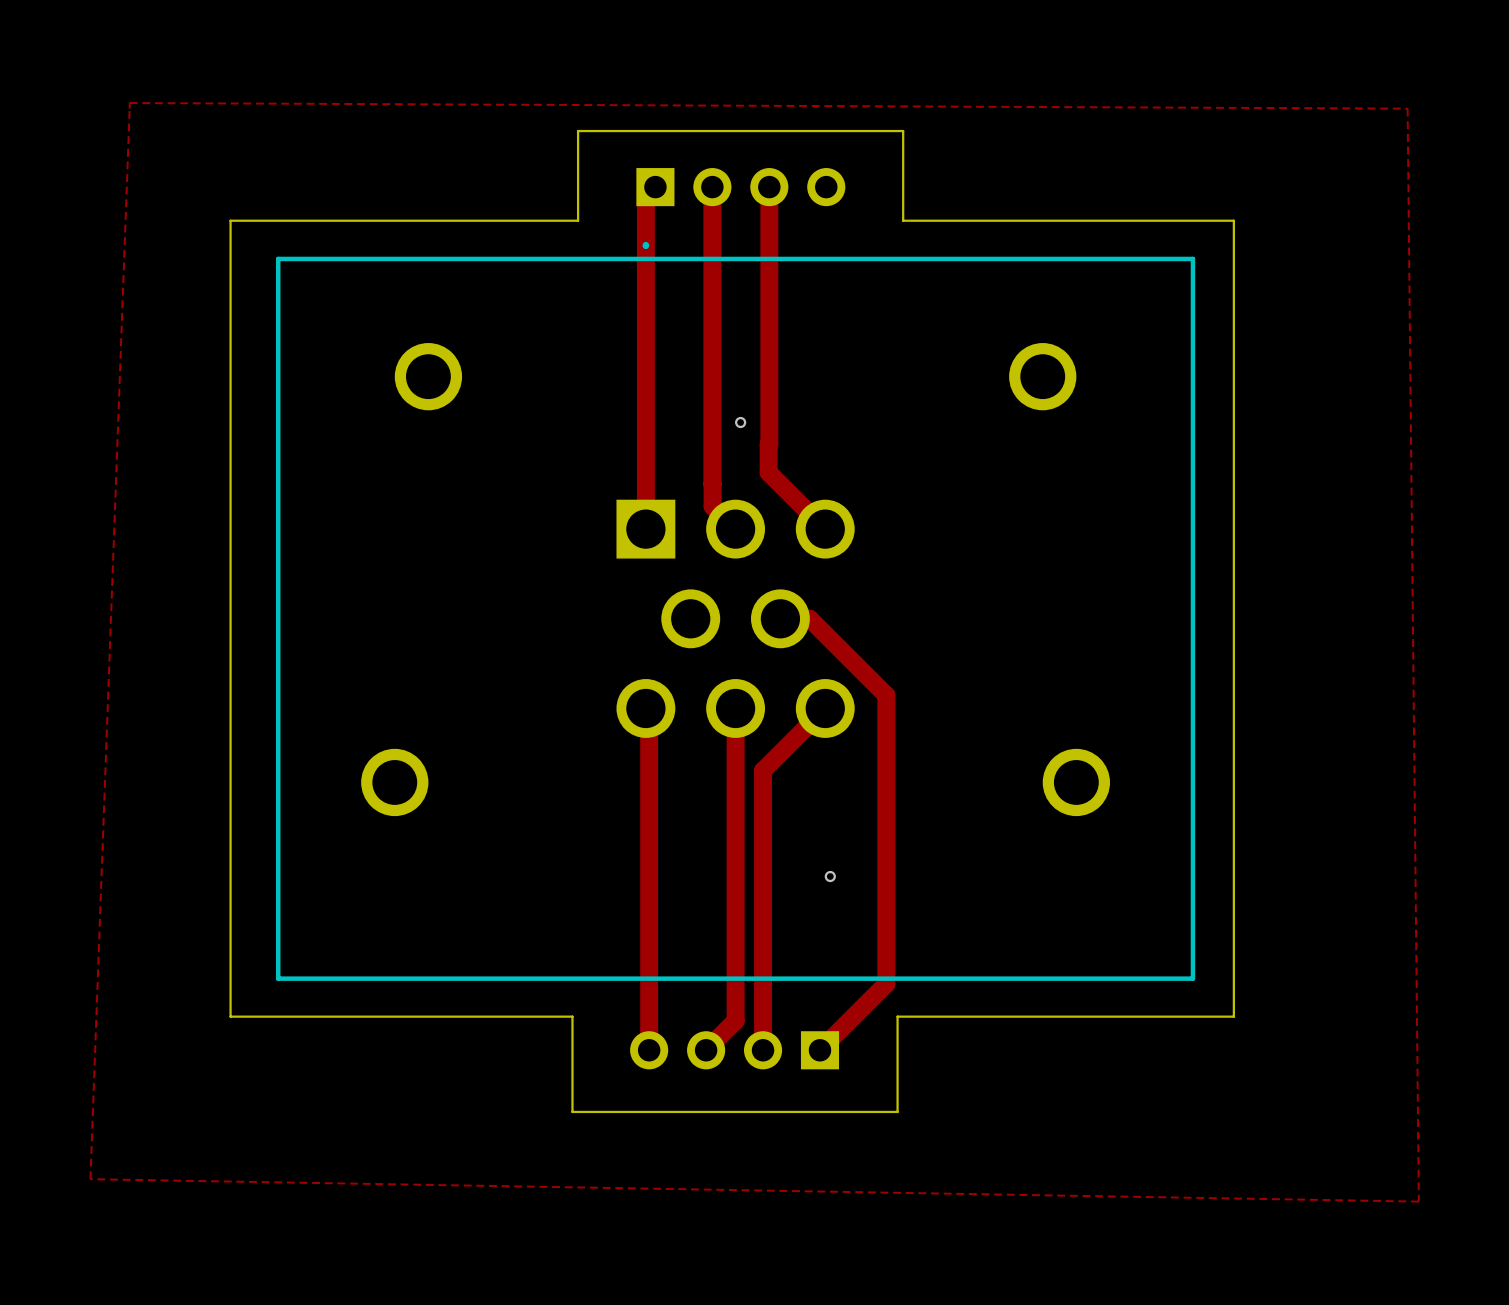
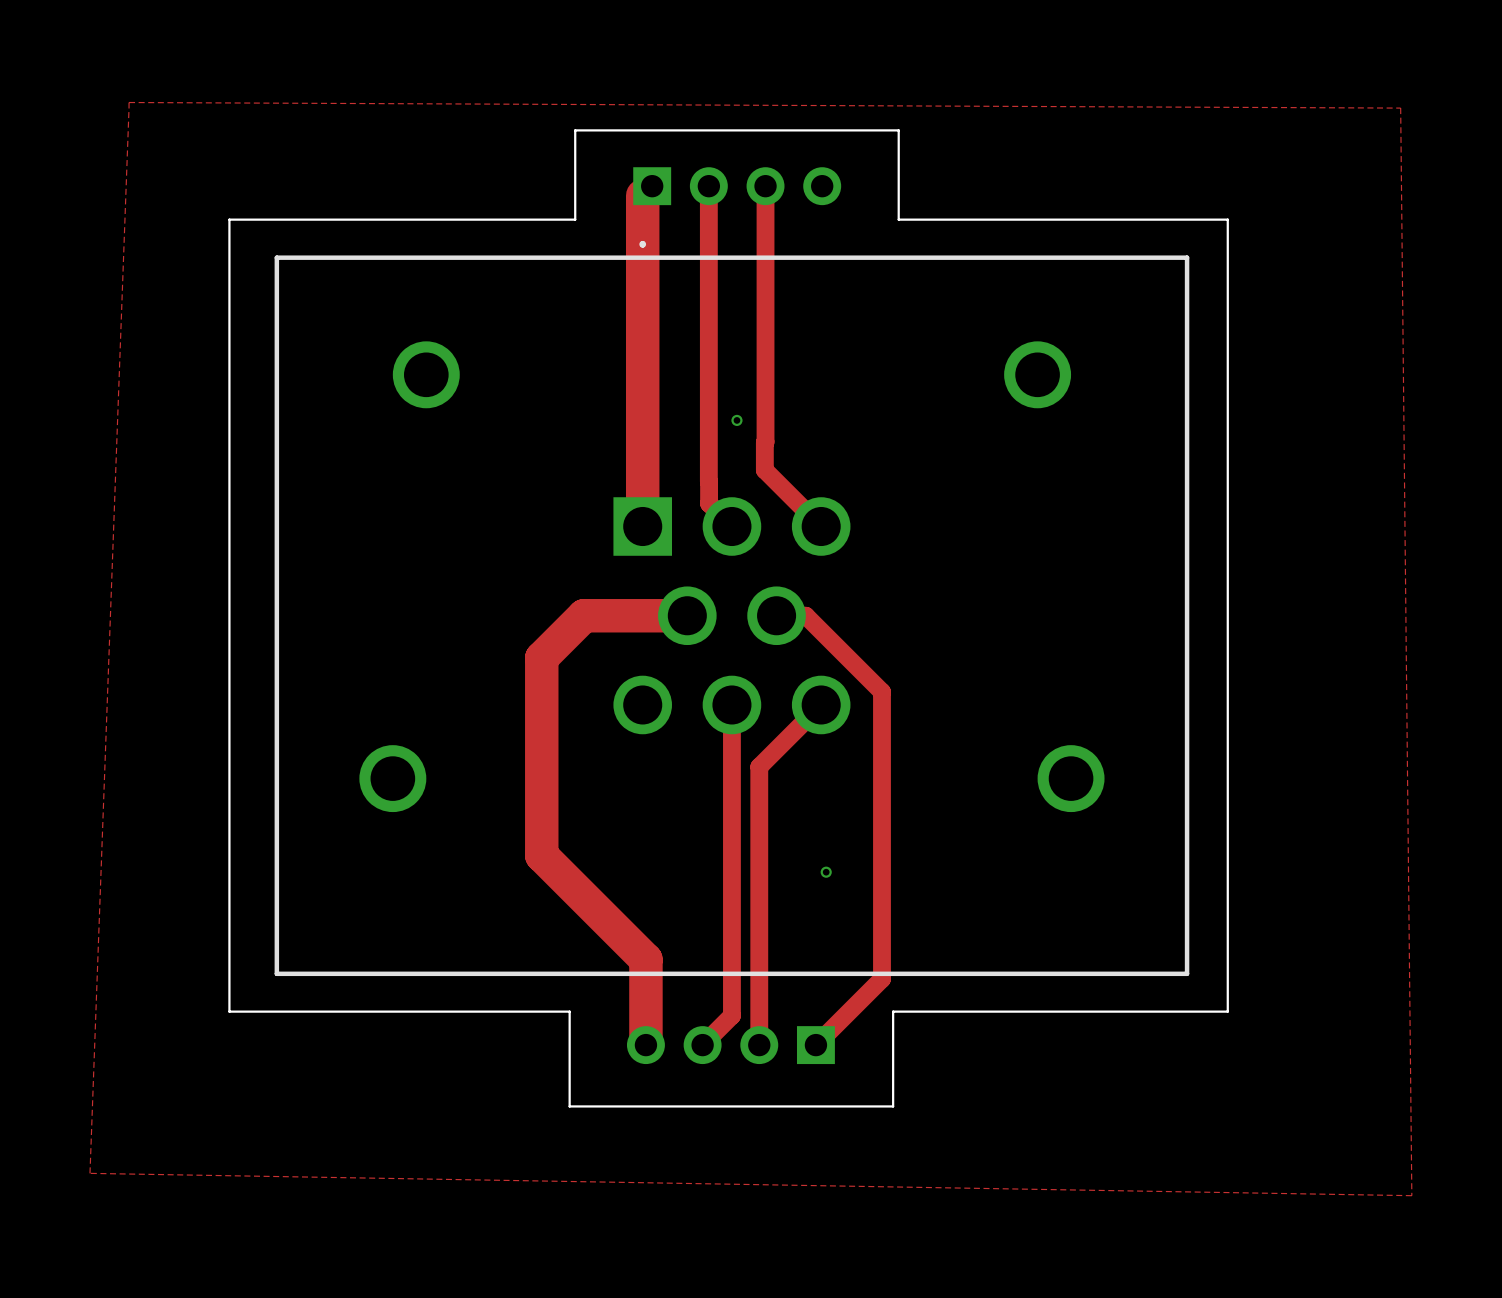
track width: thin (645, 196) (645, 529) -> thick (642, 195) (642, 526)
track: (649, 711) (649, 964) -> (687, 615) (584, 615) (541, 658) (541, 855) (645, 959)
track width: thin (649, 964) (649, 1050) -> thick (645, 959) (645, 1045)

